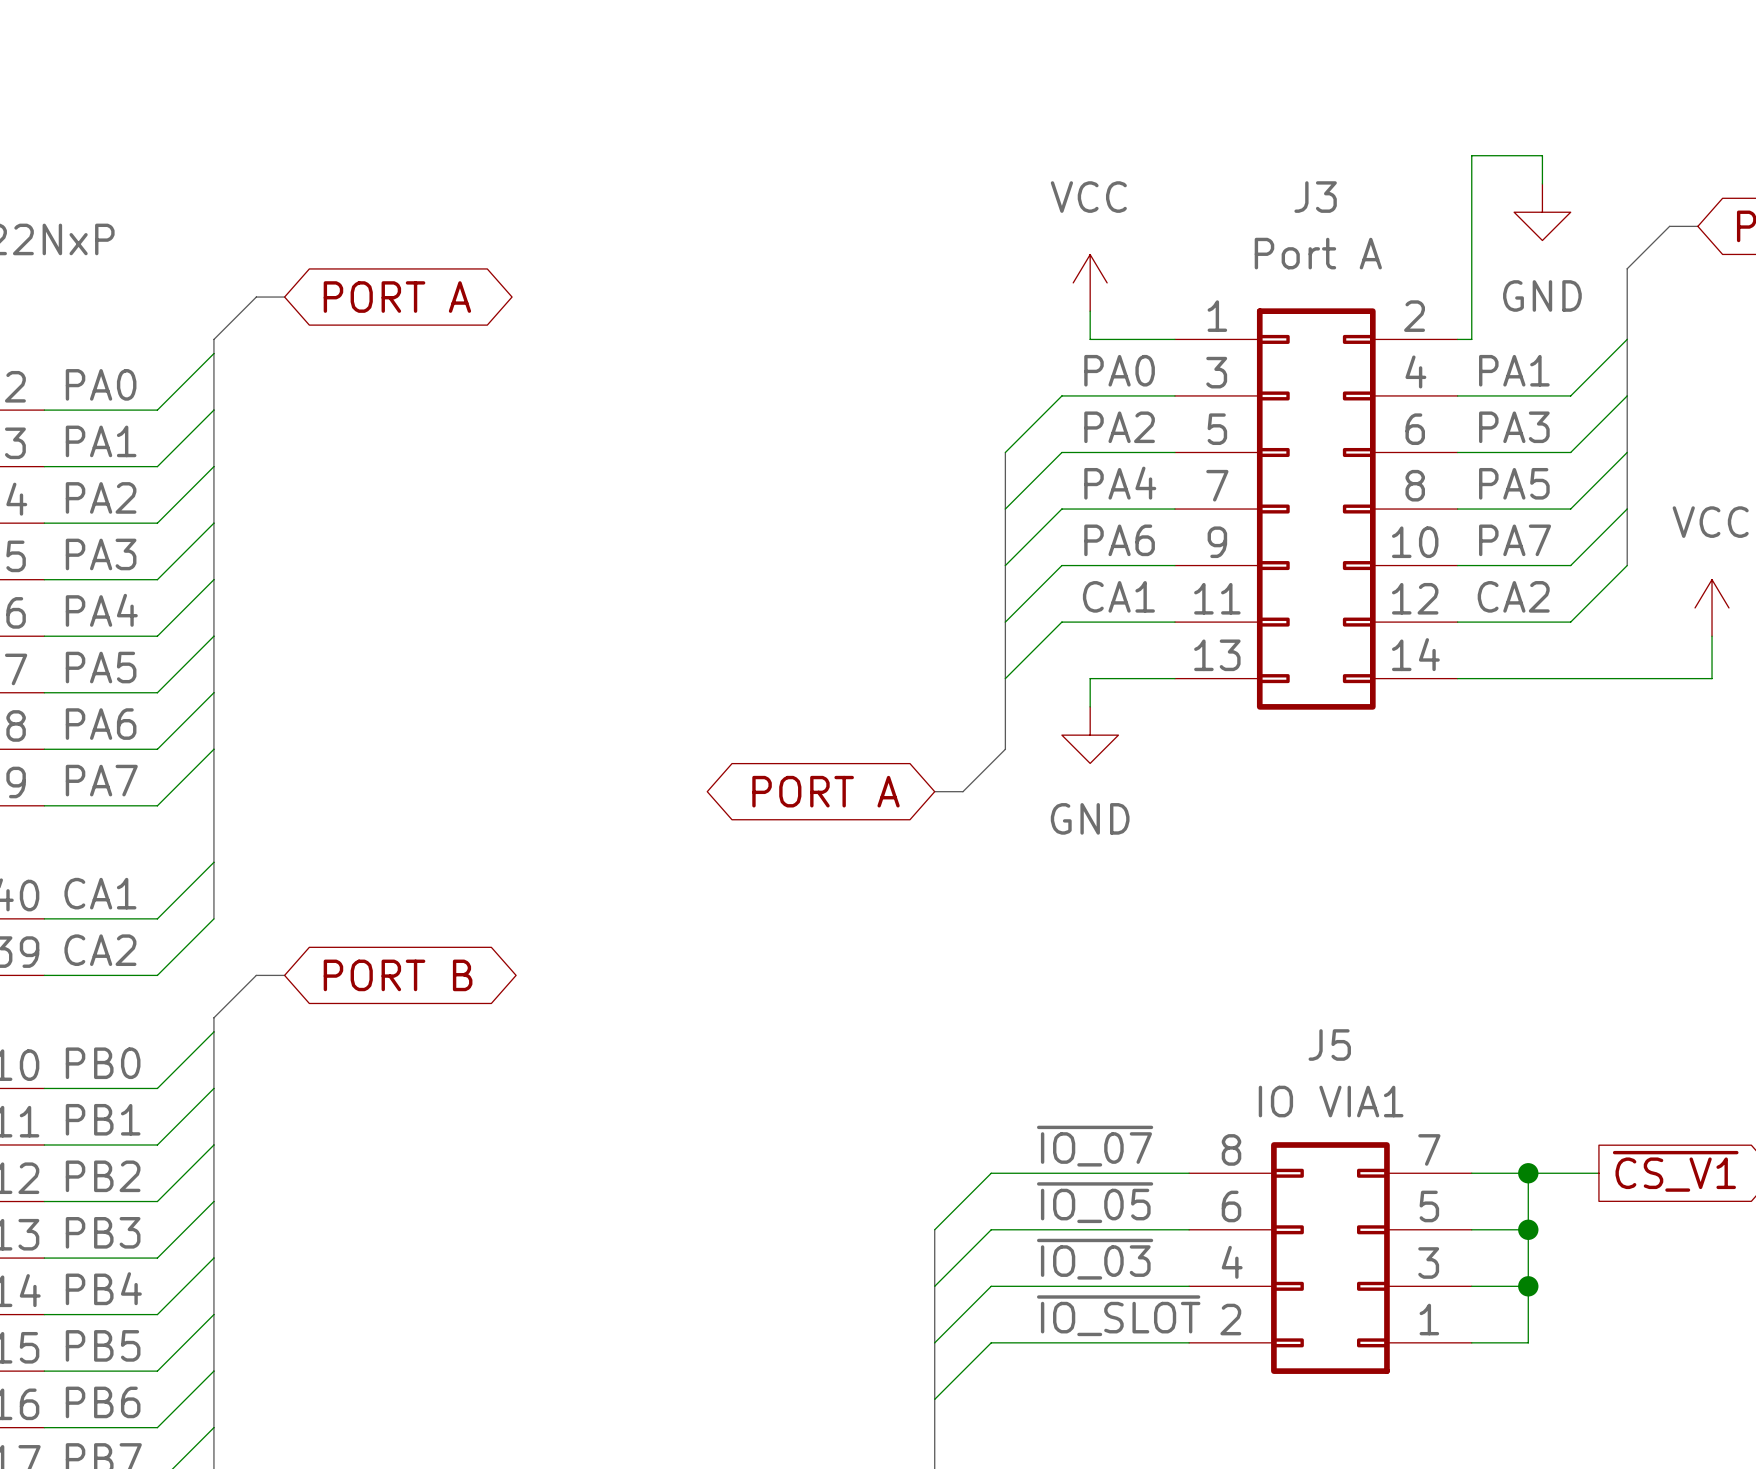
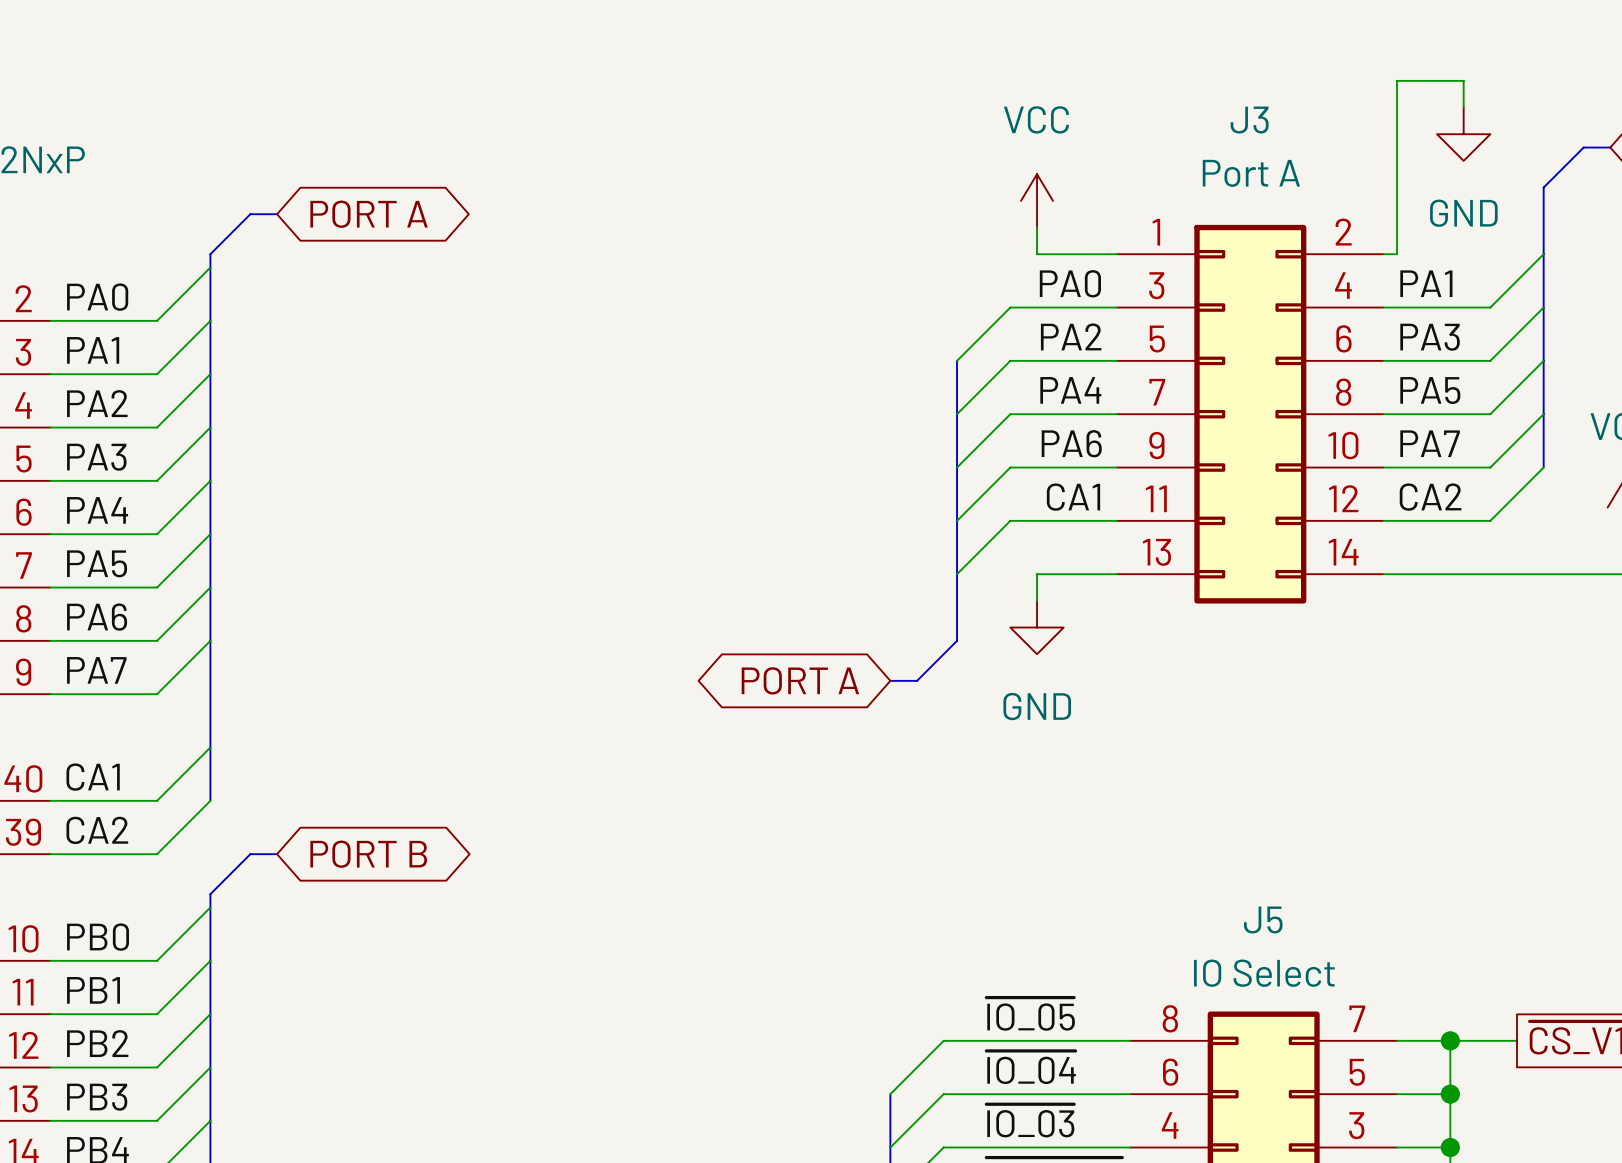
J5 value: IO VIA1 (1331, 1101) -> IO Select (1264, 973)
label: ~{IO_07} (1095, 1146) -> ~{IO_05} (1030, 1014)
label: ~{IO_05} (1095, 1202) -> ~{IO_04} (1031, 1067)

